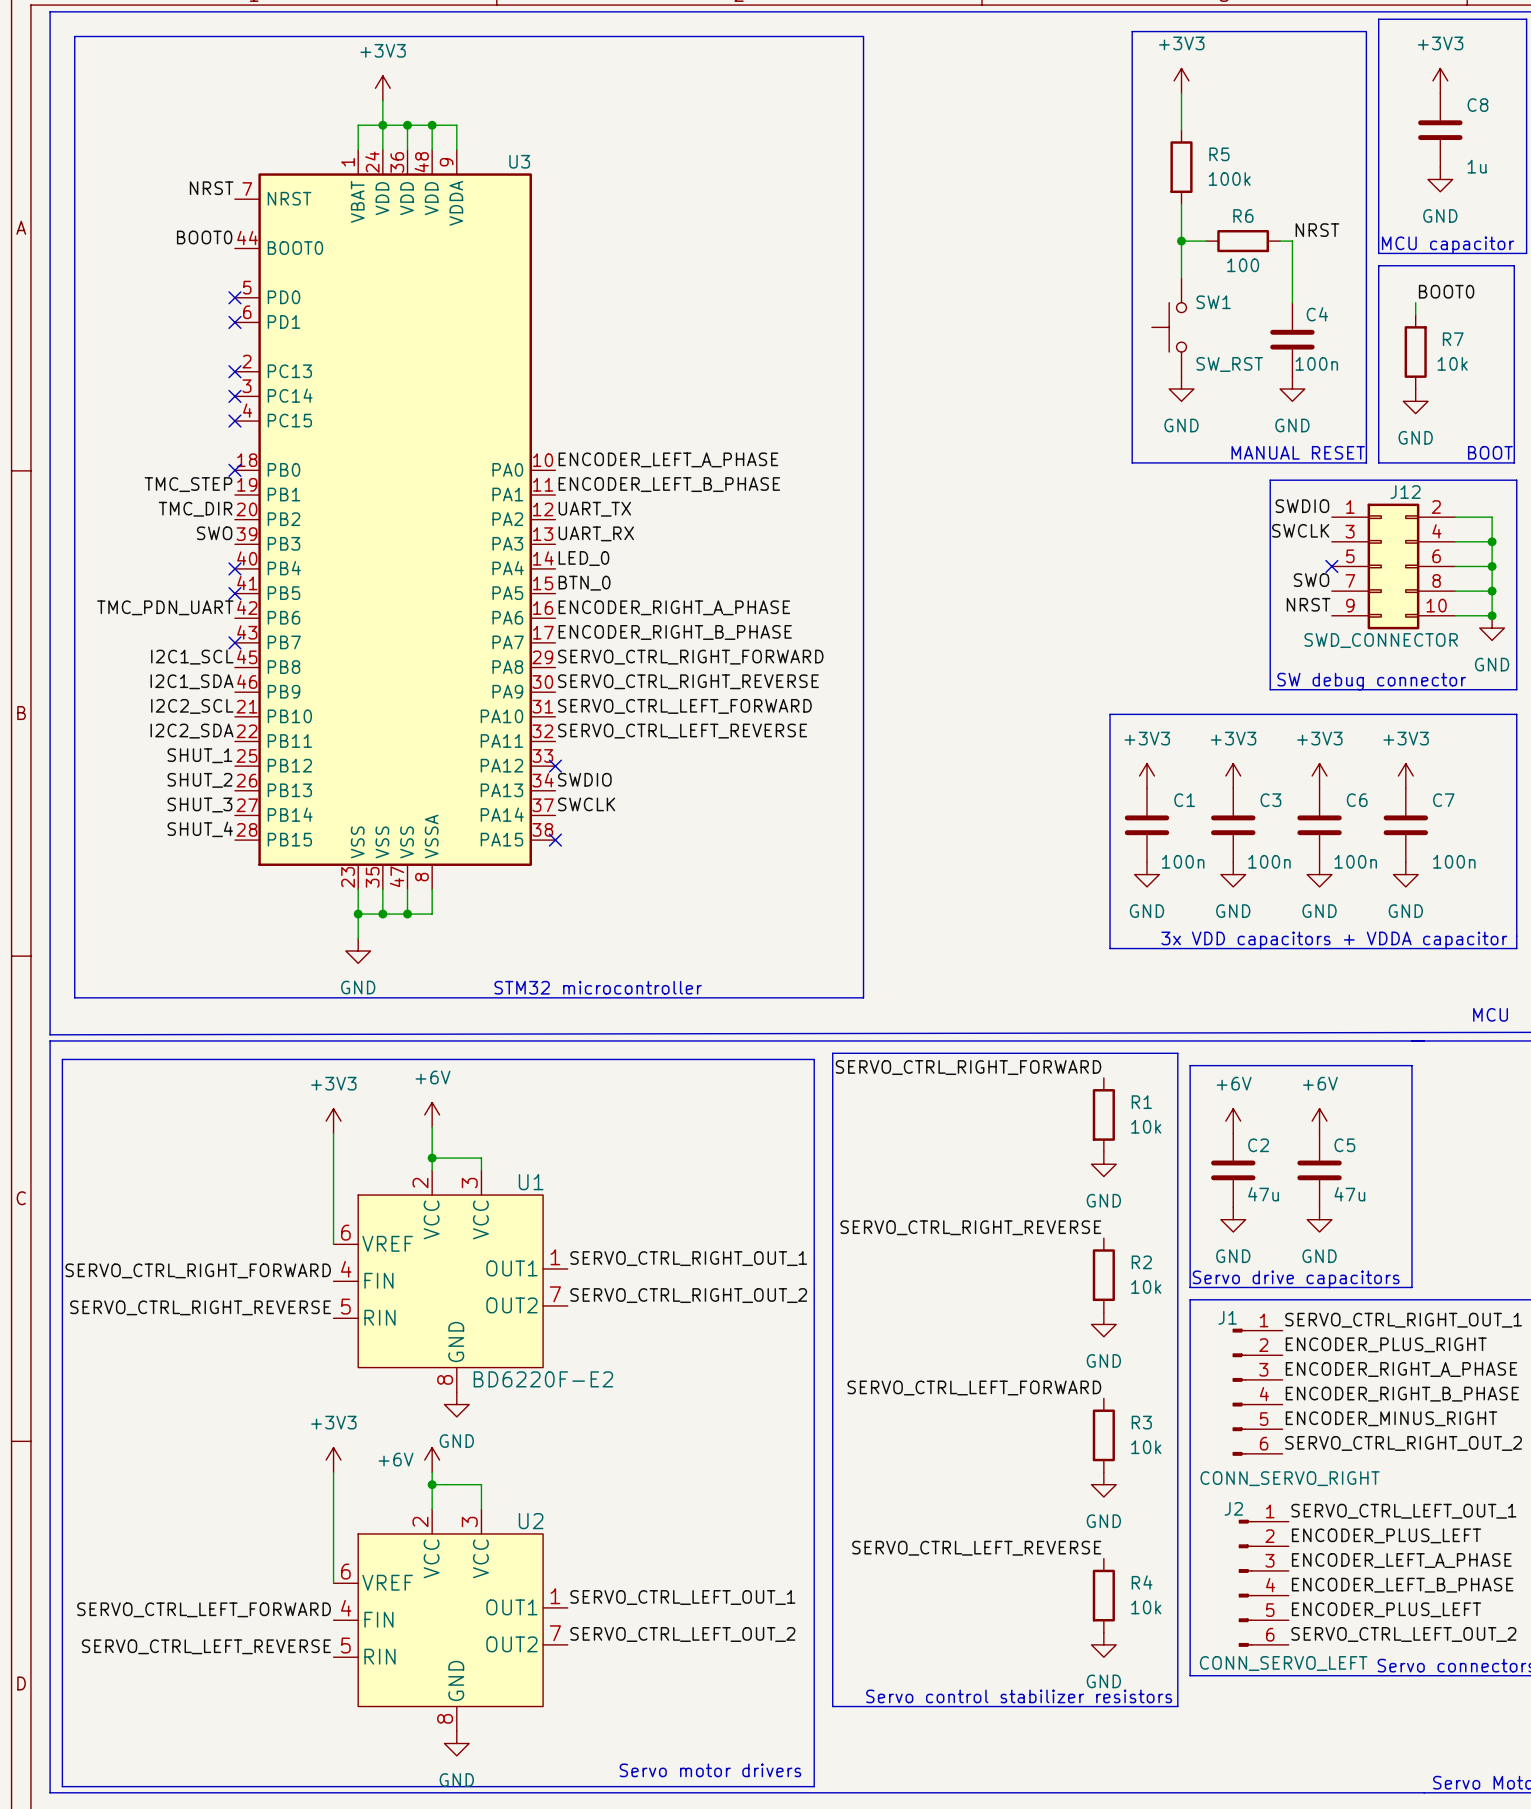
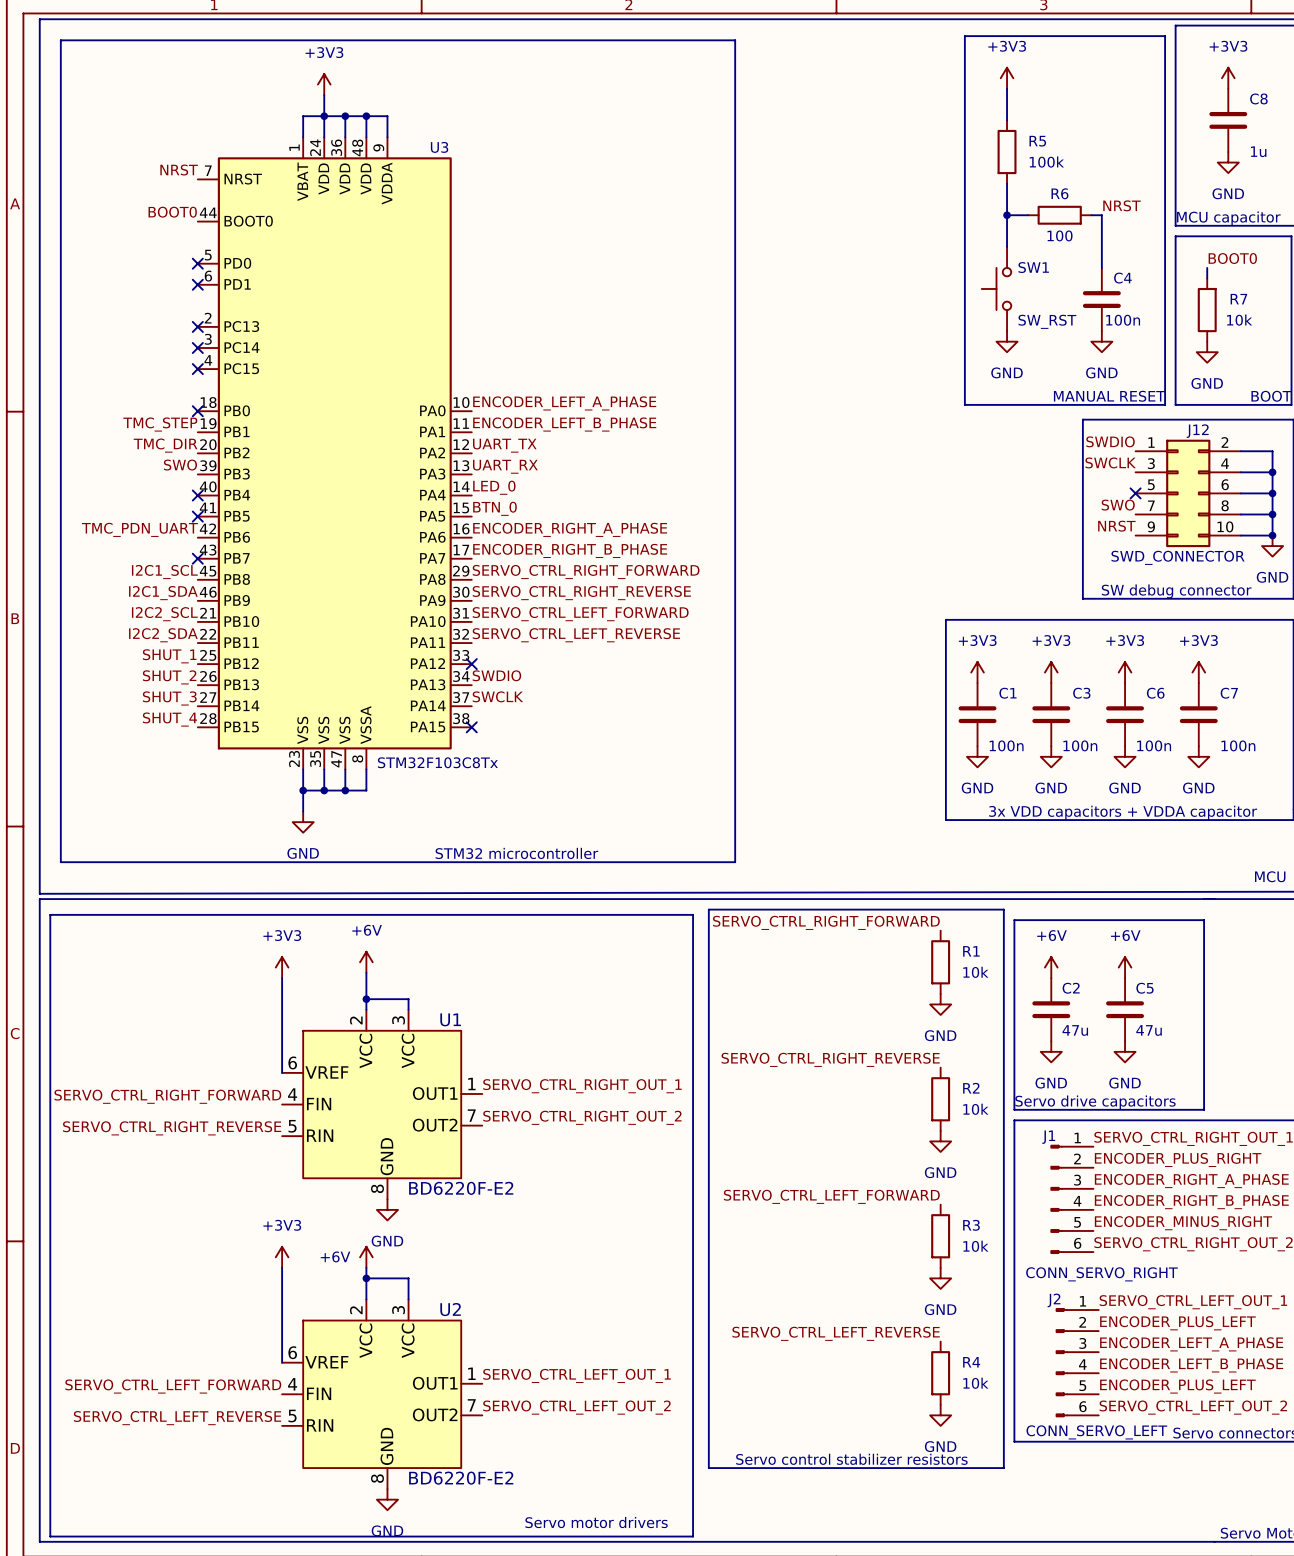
U3 value: none -> STM32F103C8Tx (437, 762)
U2 value: none -> BD6220F-E2 (461, 1478)

